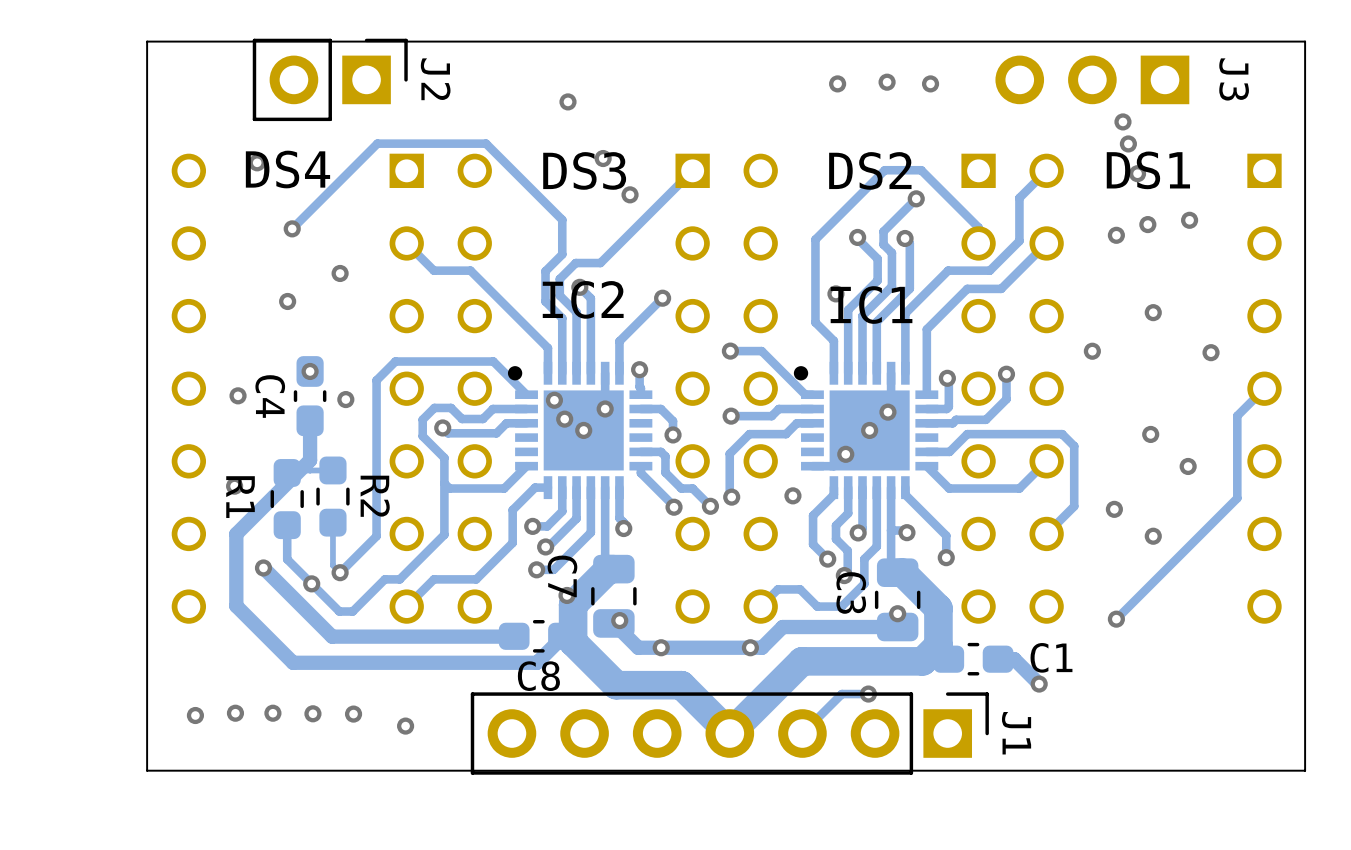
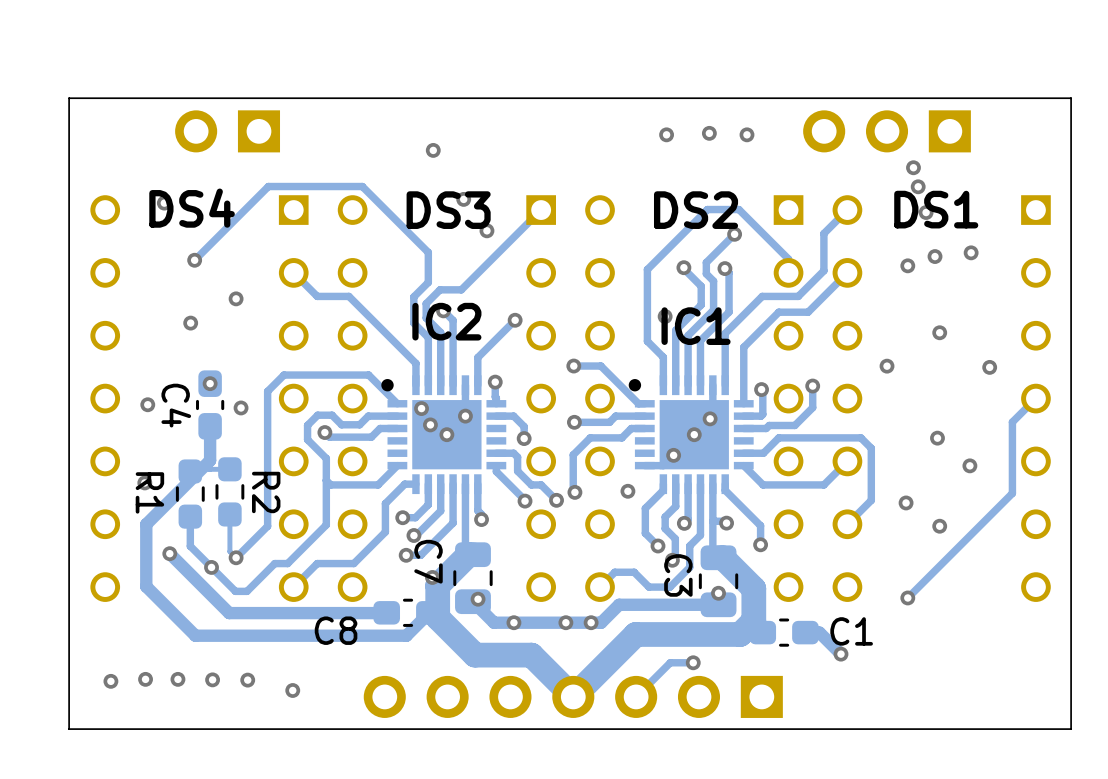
J2: (330, 79) -> none
J3 name: J3 (1234, 79) -> none
via: none -> (565, 622)
C8 name position: C8 (538, 676) -> C8 (336, 630)
J1: (729, 733) -> none

